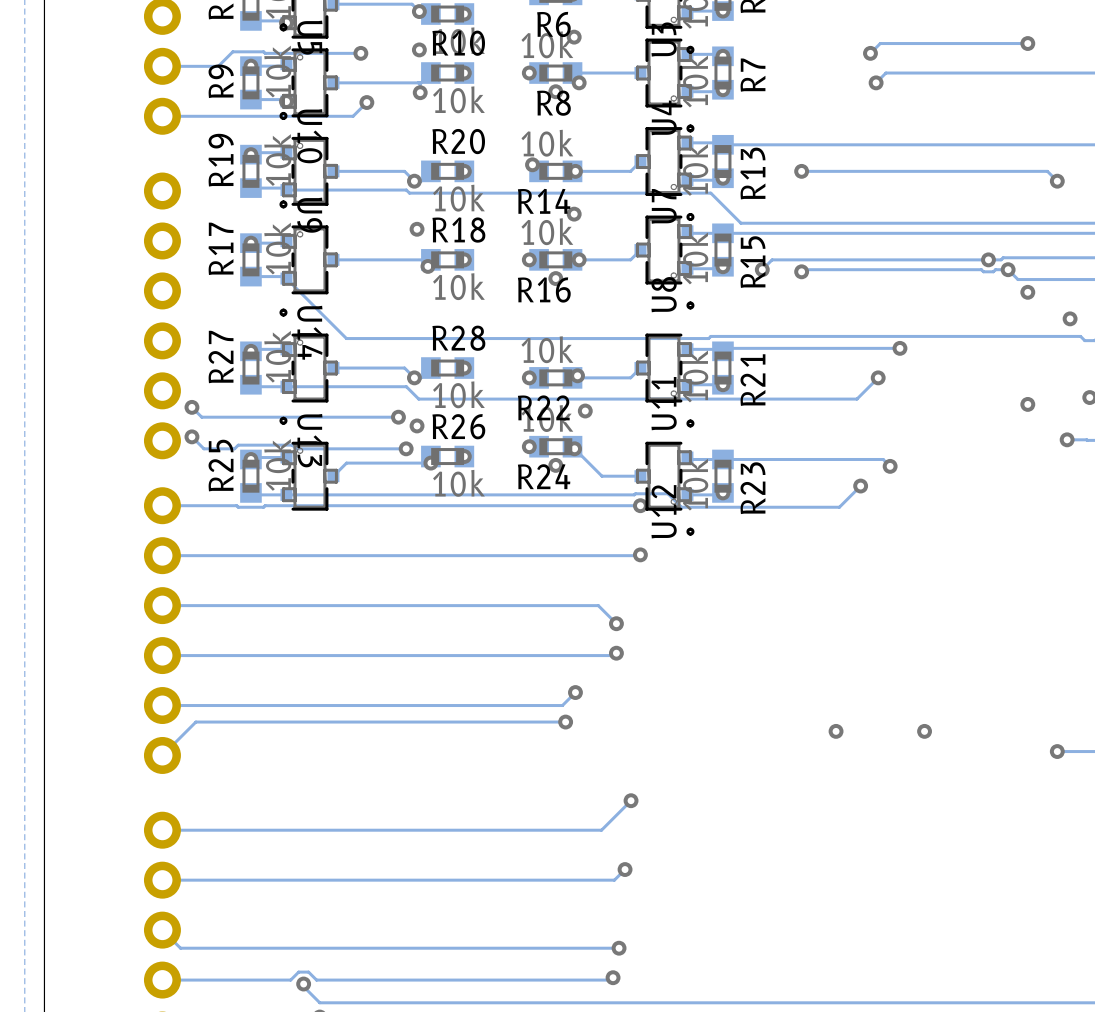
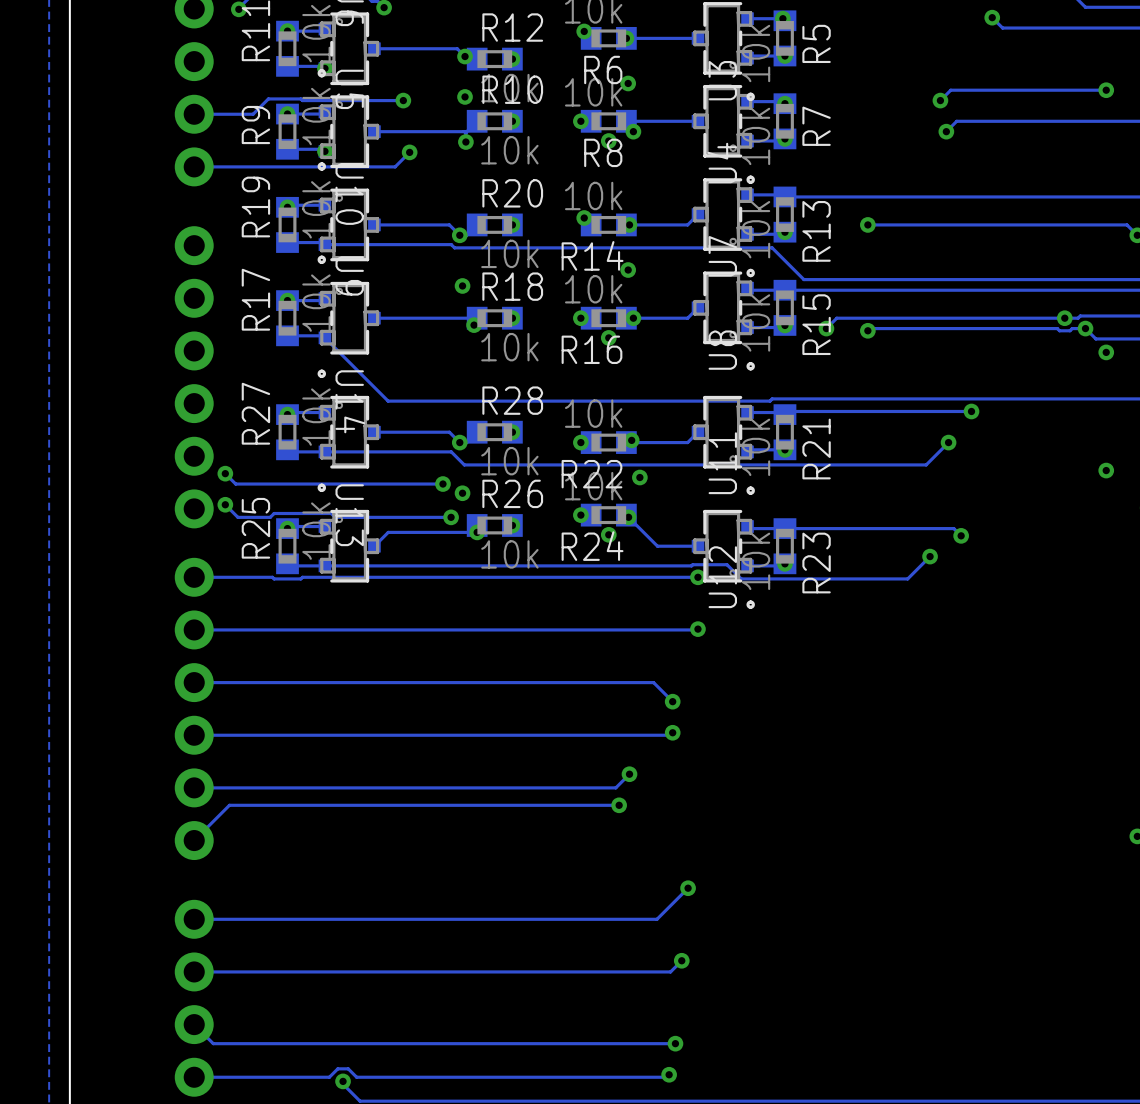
via: (836, 731) -> none
via: (924, 731) -> none

